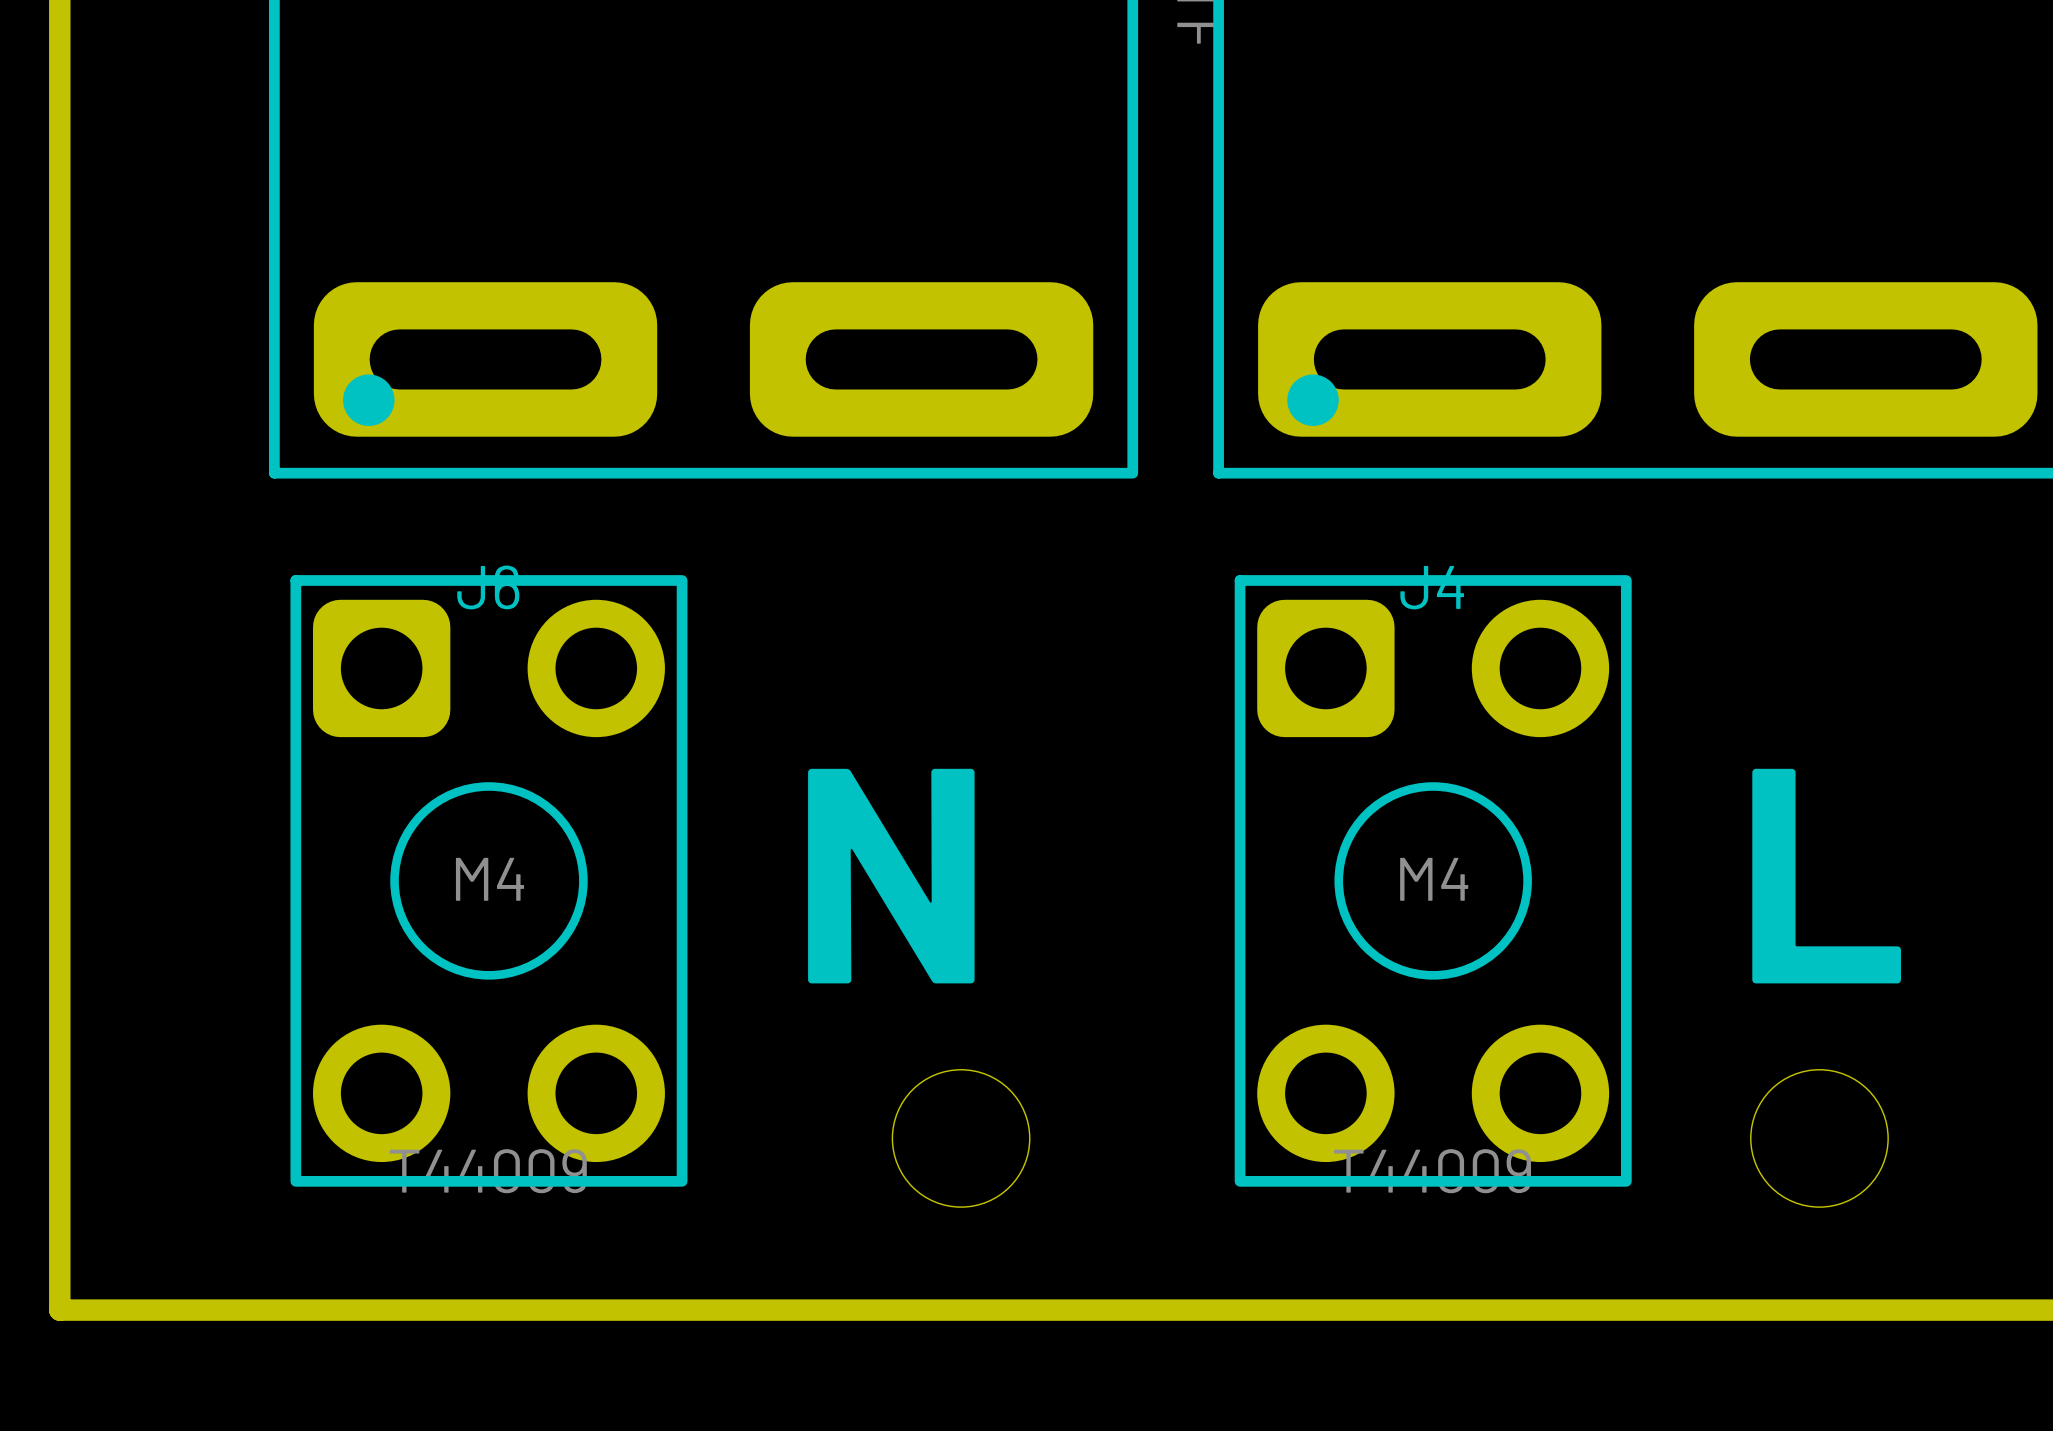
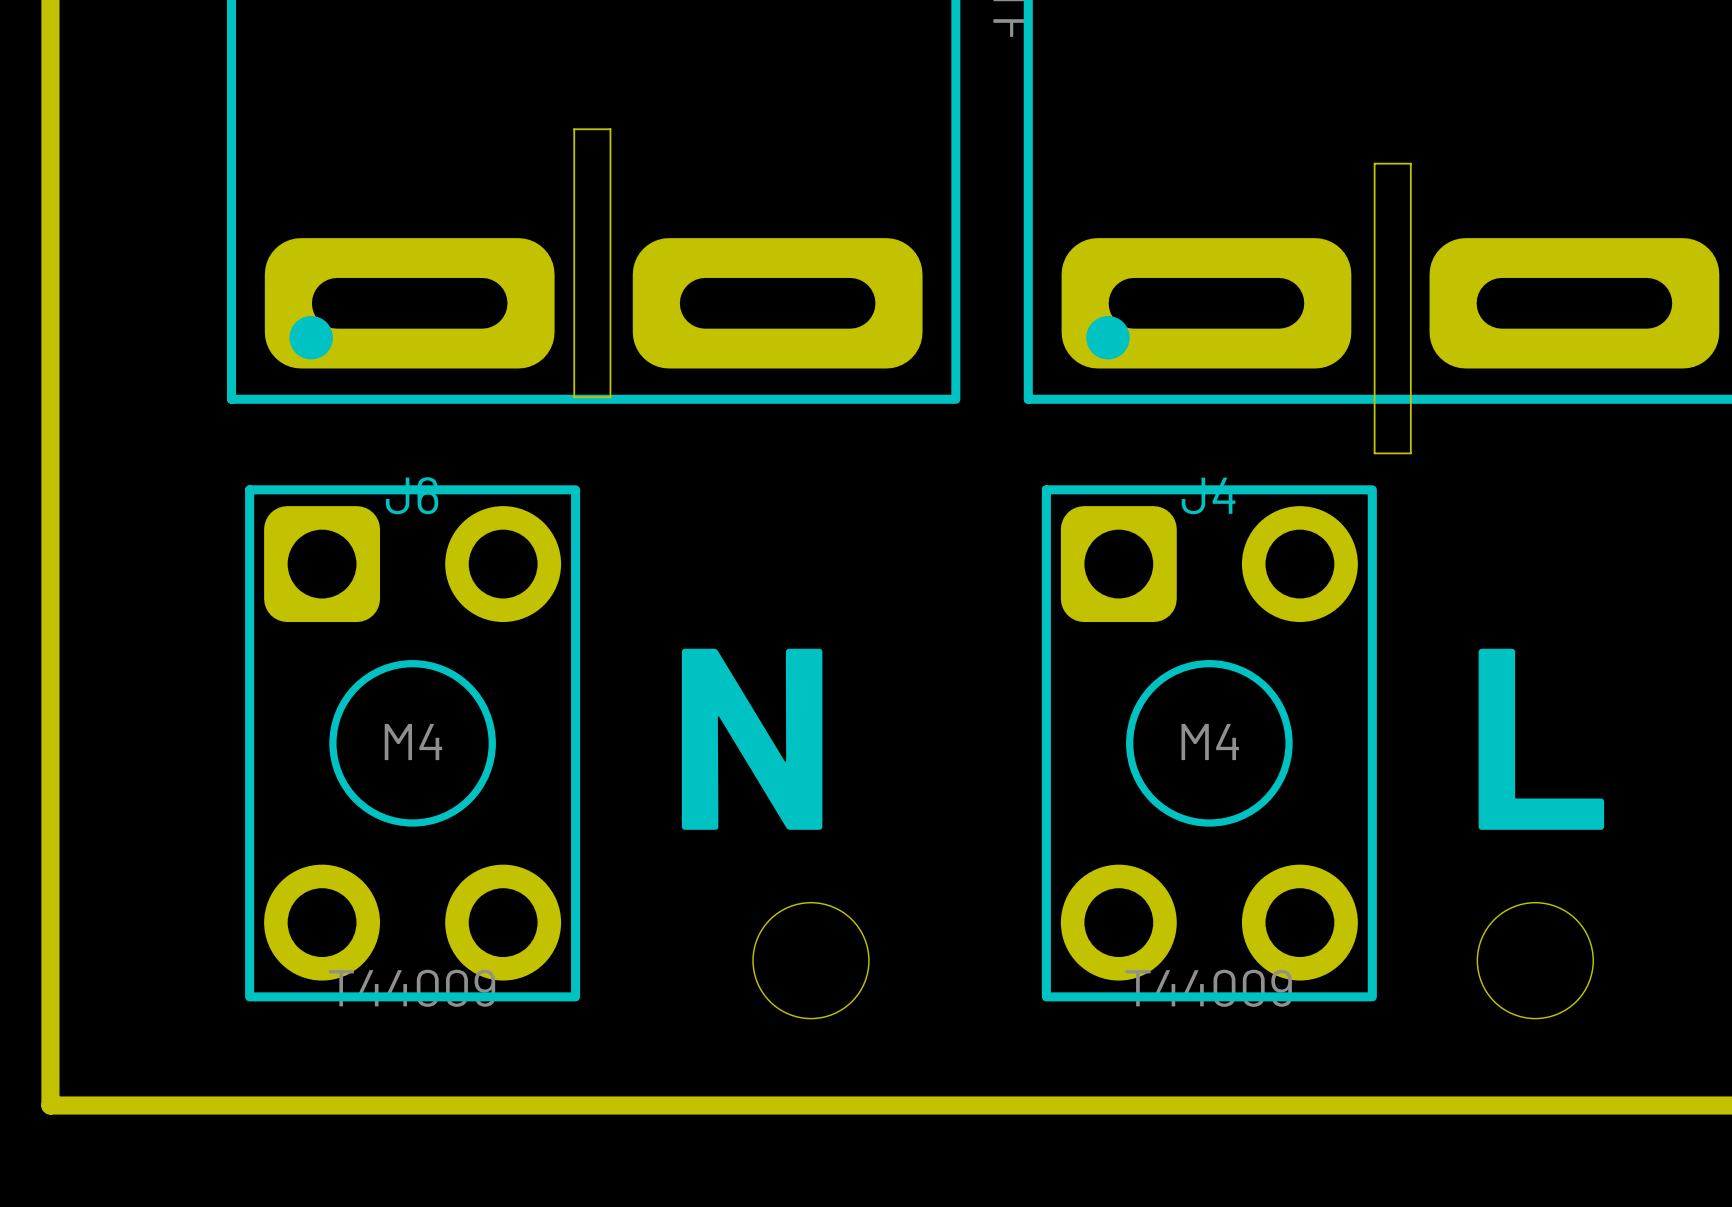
board edge: none -> (610, 129) (574, 129) (574, 397) (610, 397) (610, 129)
board edge: none -> (1410, 163) (1374, 163) (1374, 453) (1410, 453) (1410, 163)

